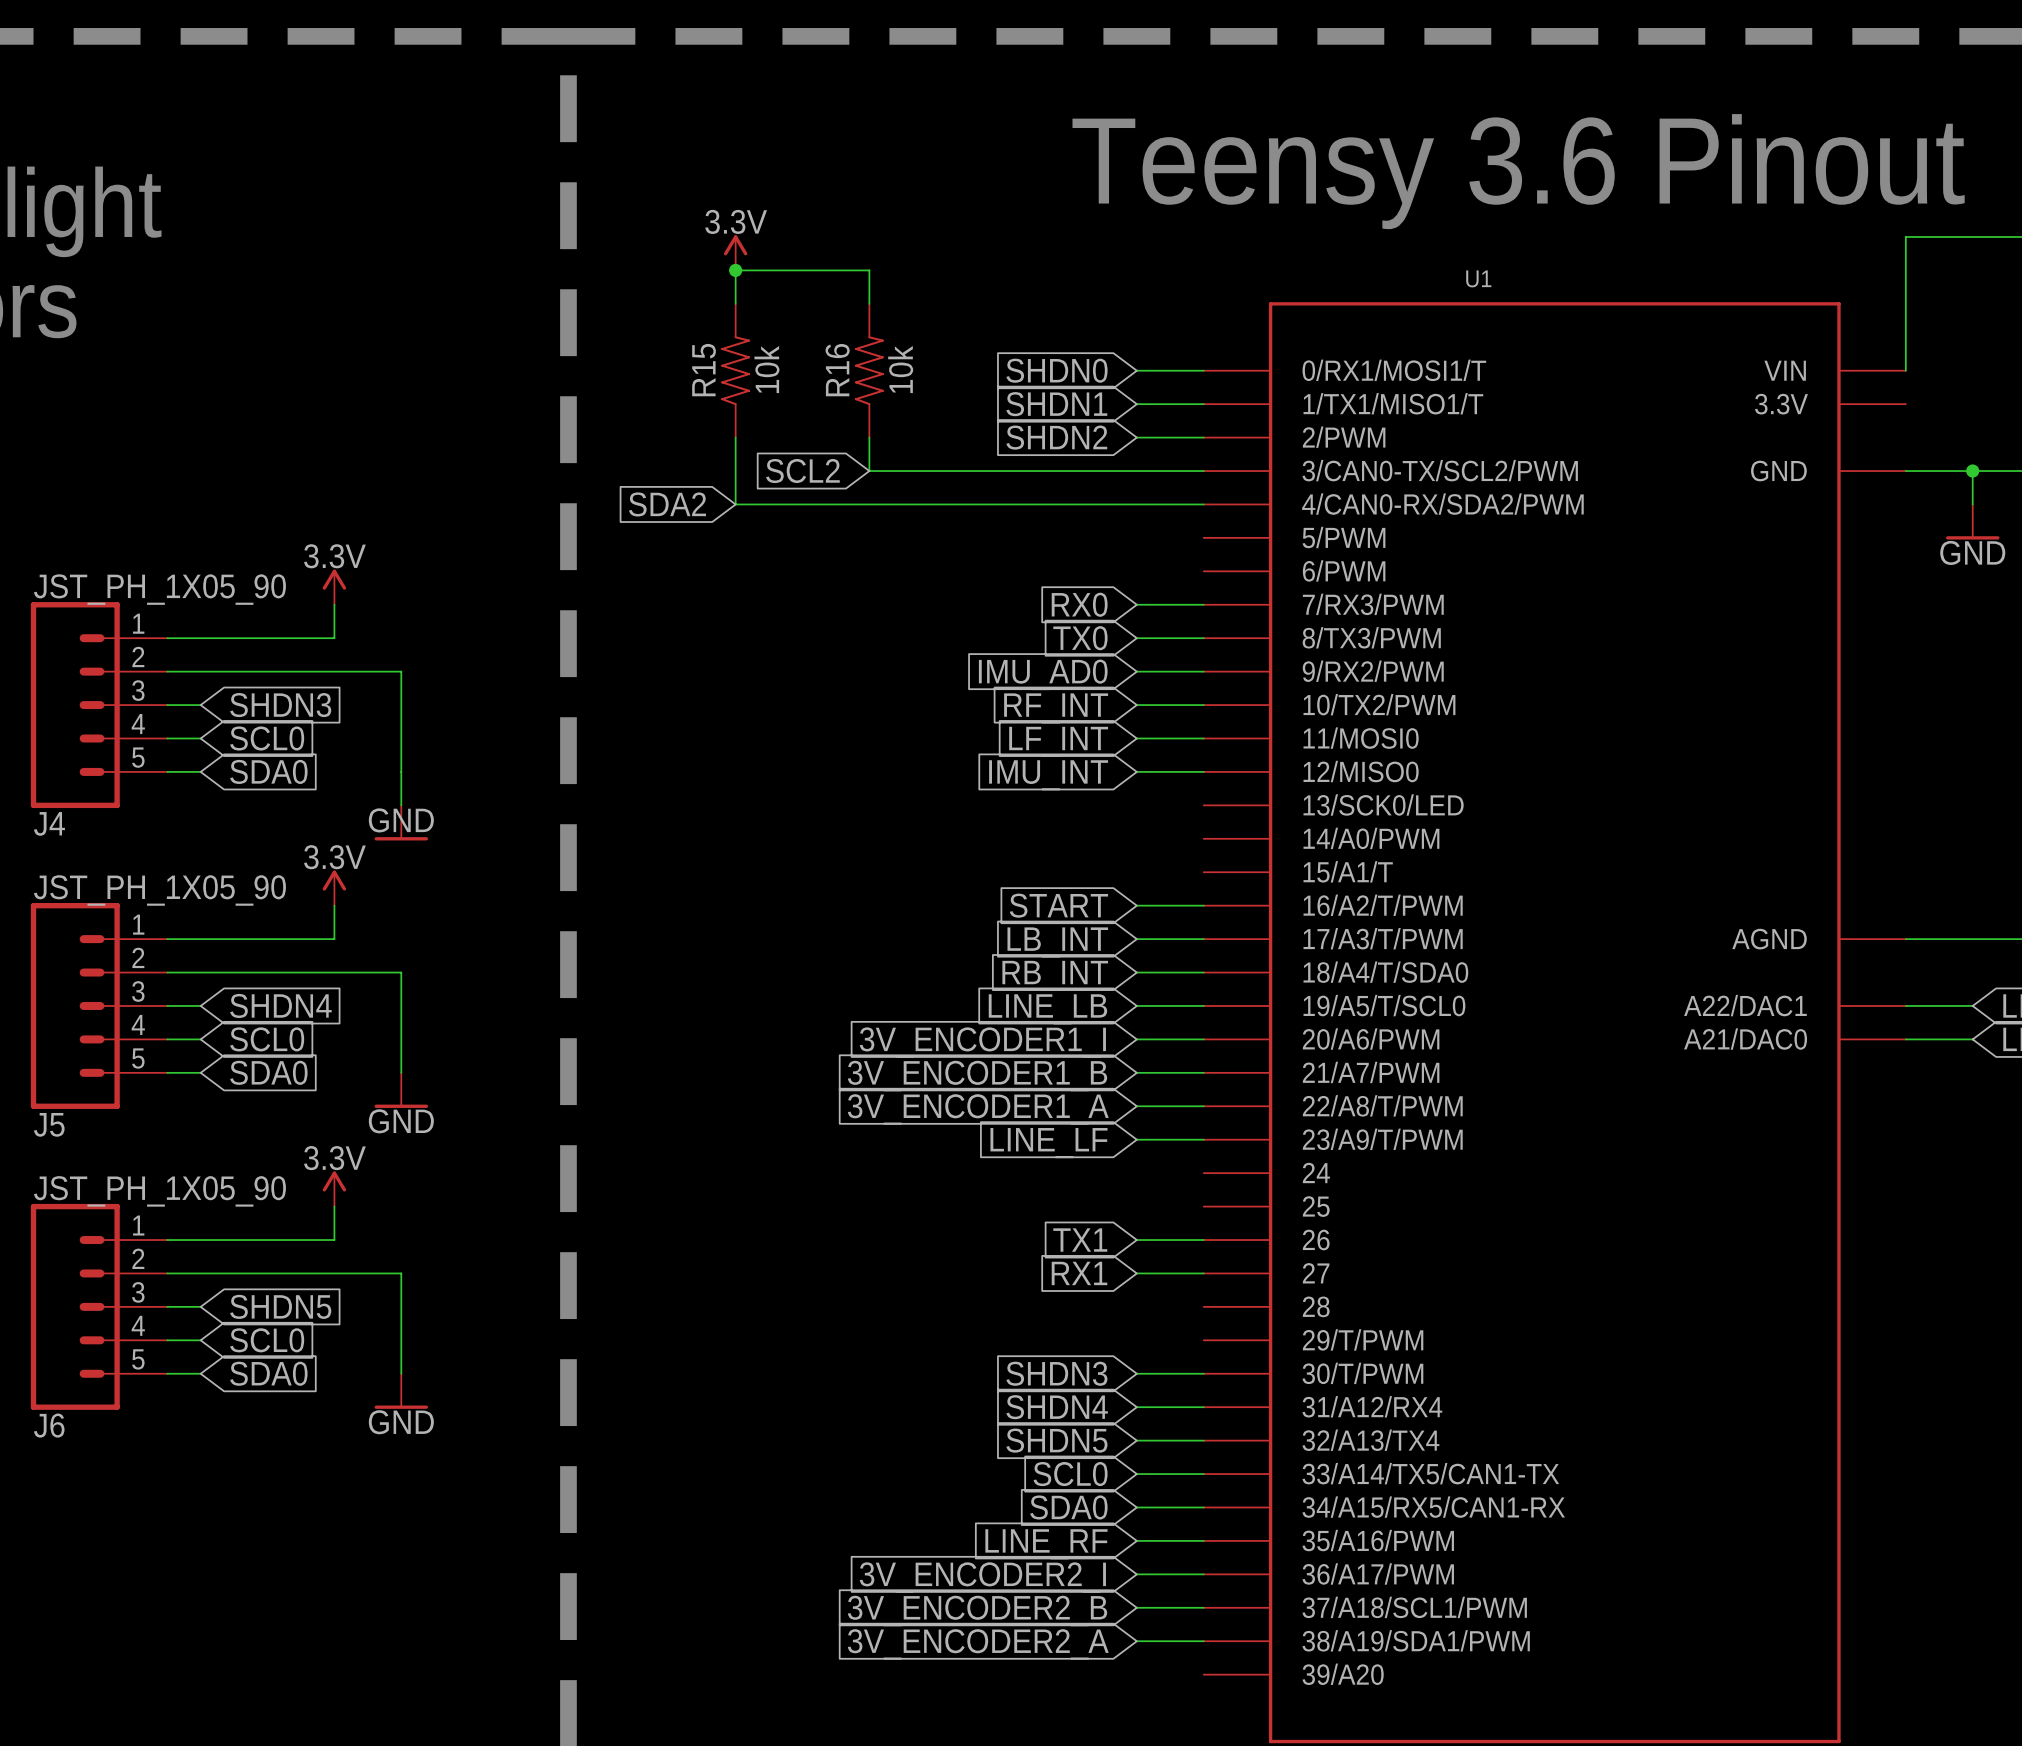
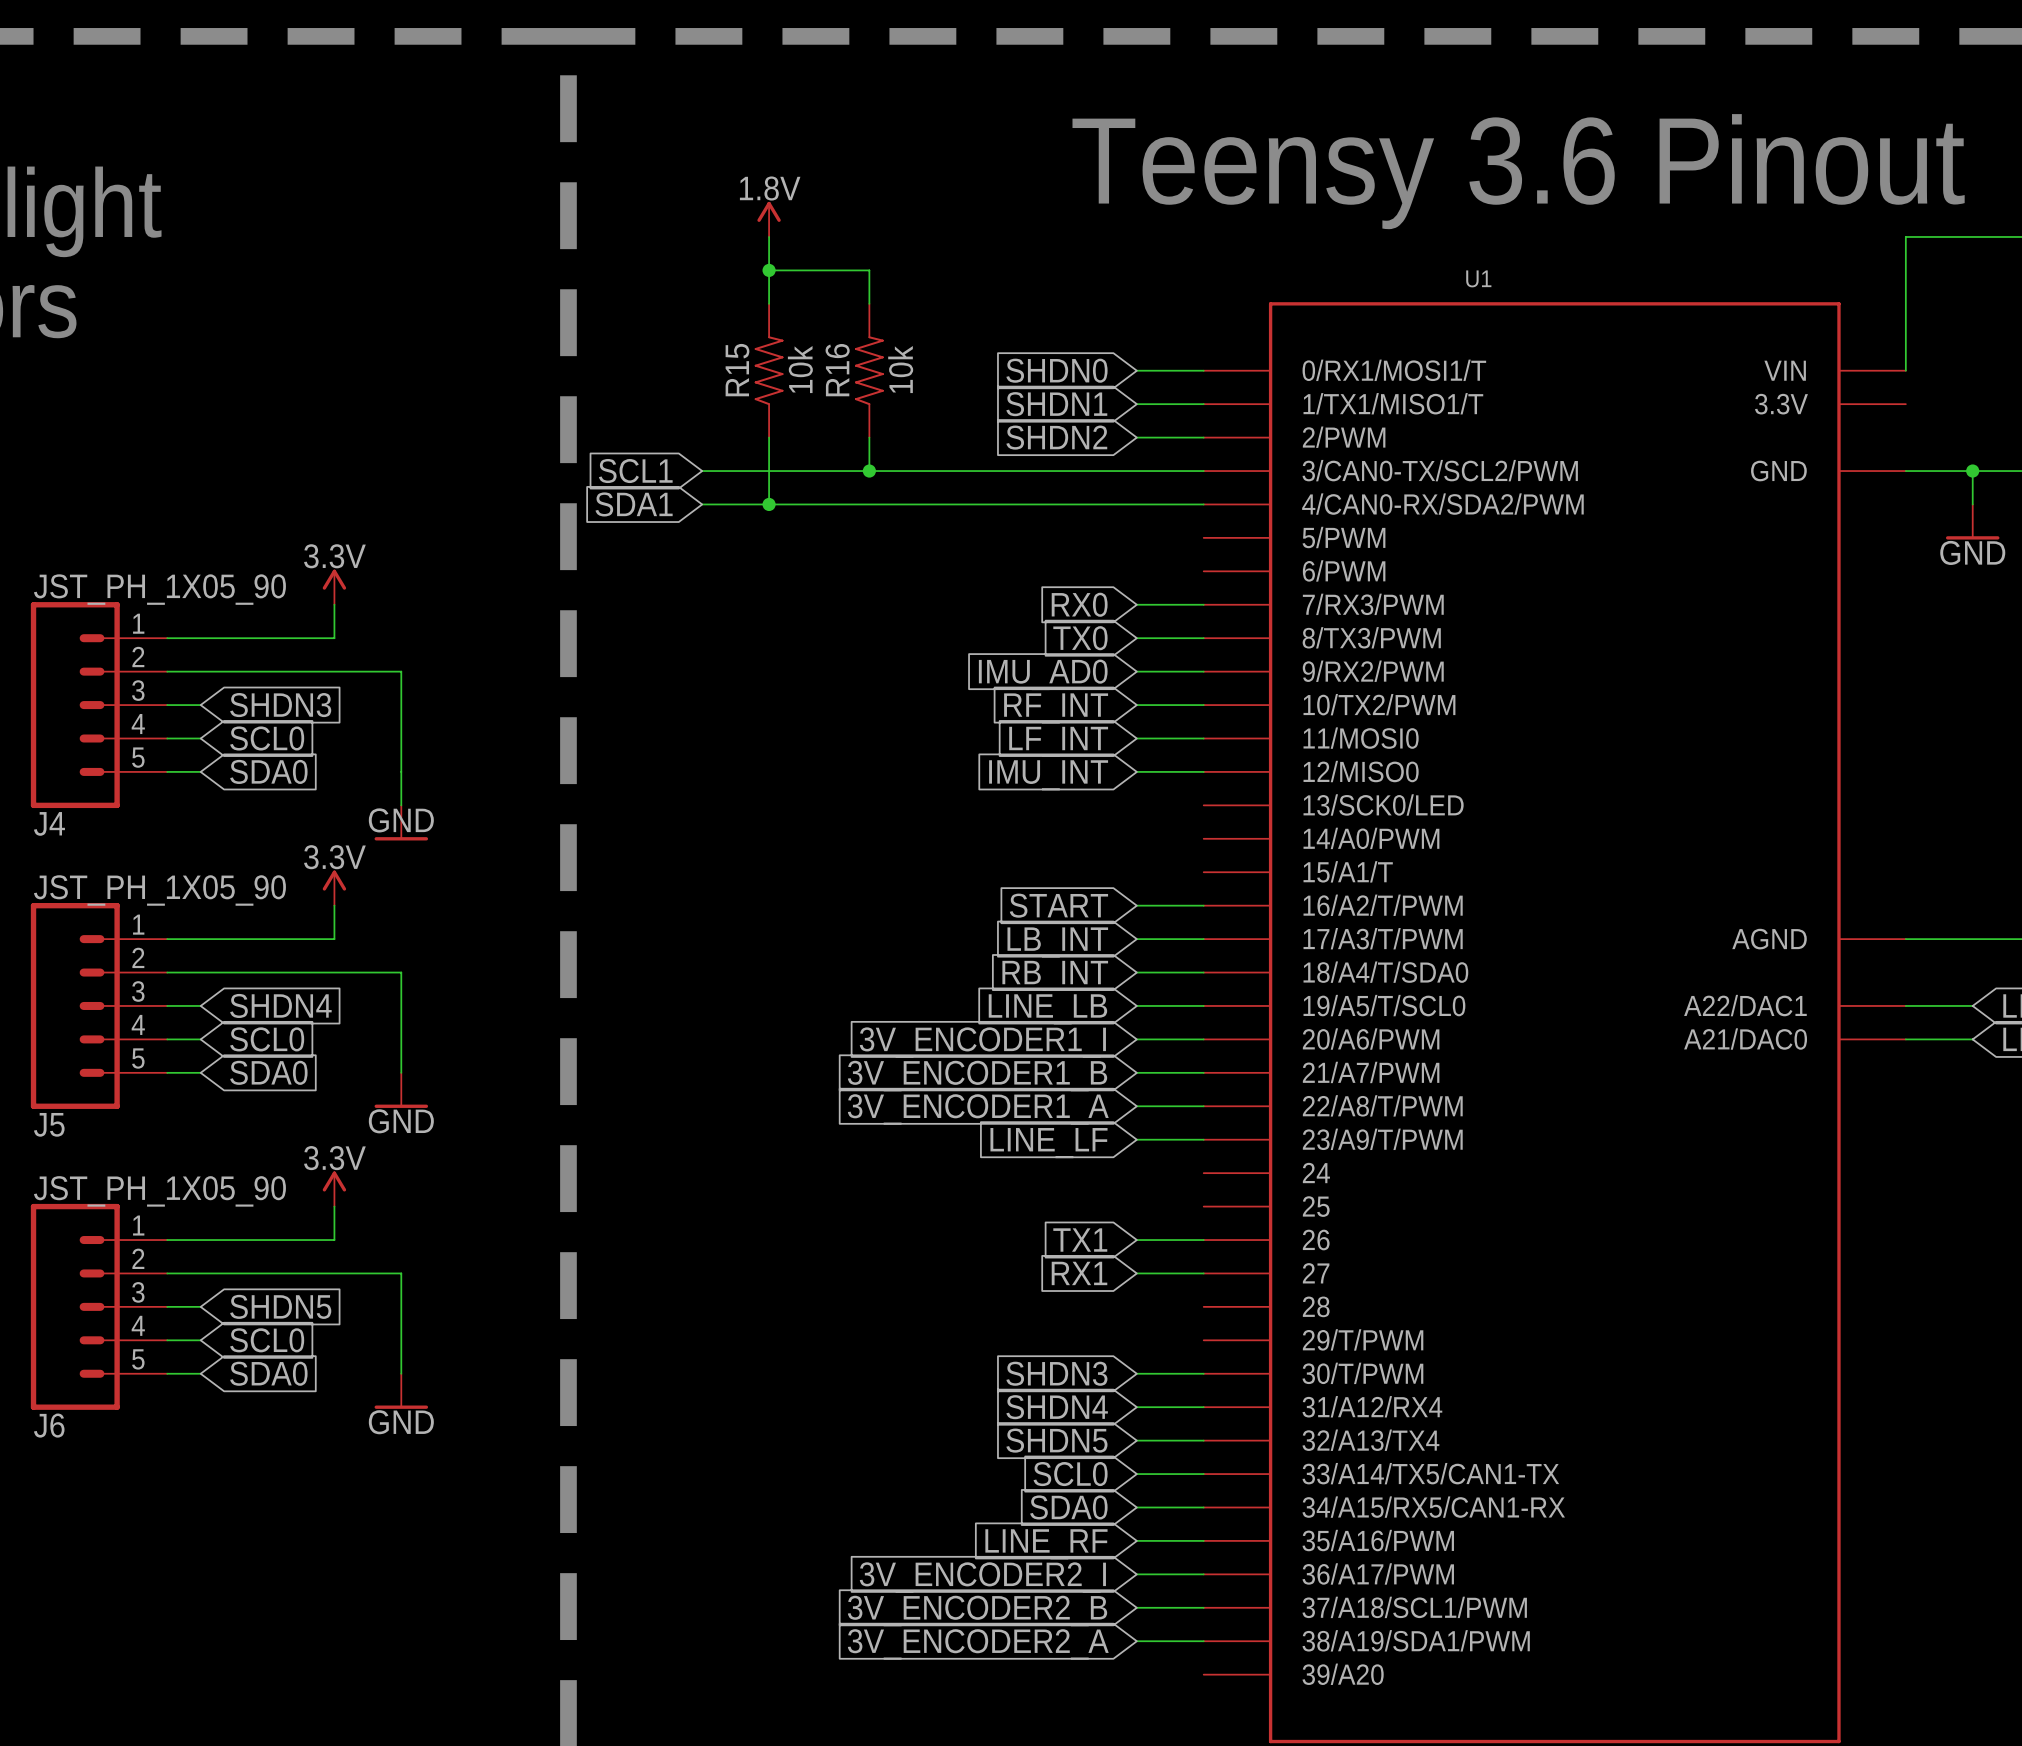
power symbol: none -> 1.8V (769, 219)
wire: none -> (769, 236) (769, 303)
power symbol: 3.3V (735, 252) -> none
junction position: (735, 270) -> (769, 270)
wire: (769, 270) (735, 270) (735, 303) -> none
R15 position: (735, 370) -> (769, 370)
wire: (735, 437) (735, 504) -> (702, 504) (735, 504)
wire: none -> (769, 437) (769, 504)
global label: none -> SCL1 (635, 471)
wire: none -> (702, 471) (869, 471)
global label: SCL2 (802, 471) -> none
junction: none -> (869, 471)
global label: SDA2 (667, 504) -> SDA1 (634, 504)
junction: none -> (769, 504)

